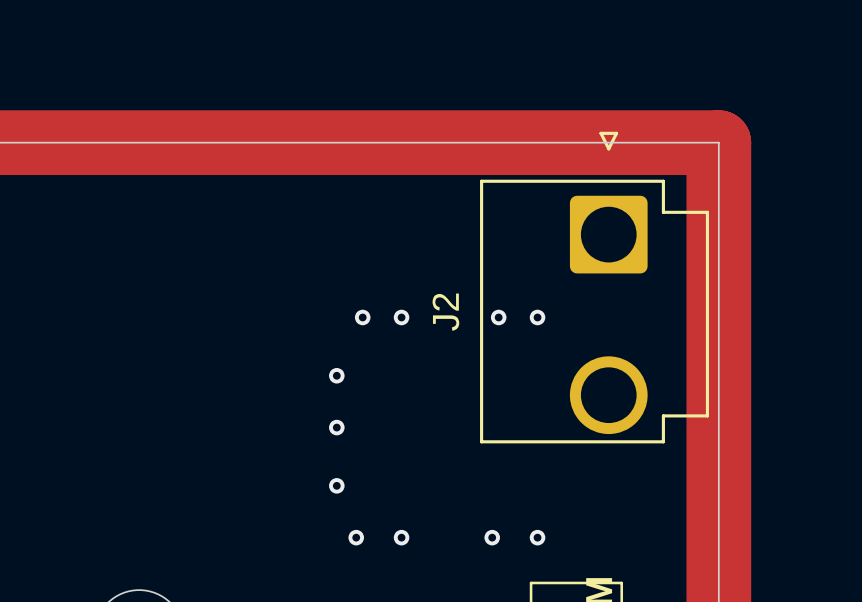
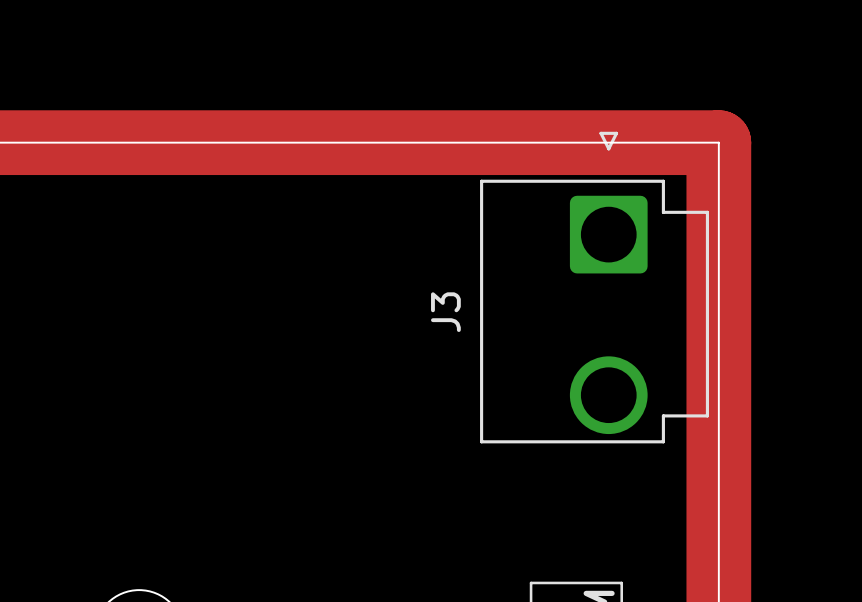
J2 name: J2 (445, 312) -> J3 (445, 312)
via: (362, 317) -> none
via: (401, 317) -> none
via: (498, 317) -> none
via: (537, 317) -> none
via: (336, 375) -> none
via: (336, 427) -> none
via: (336, 485) -> none
via: (356, 537) -> none
via: (401, 537) -> none
via: (492, 537) -> none
via: (537, 537) -> none

